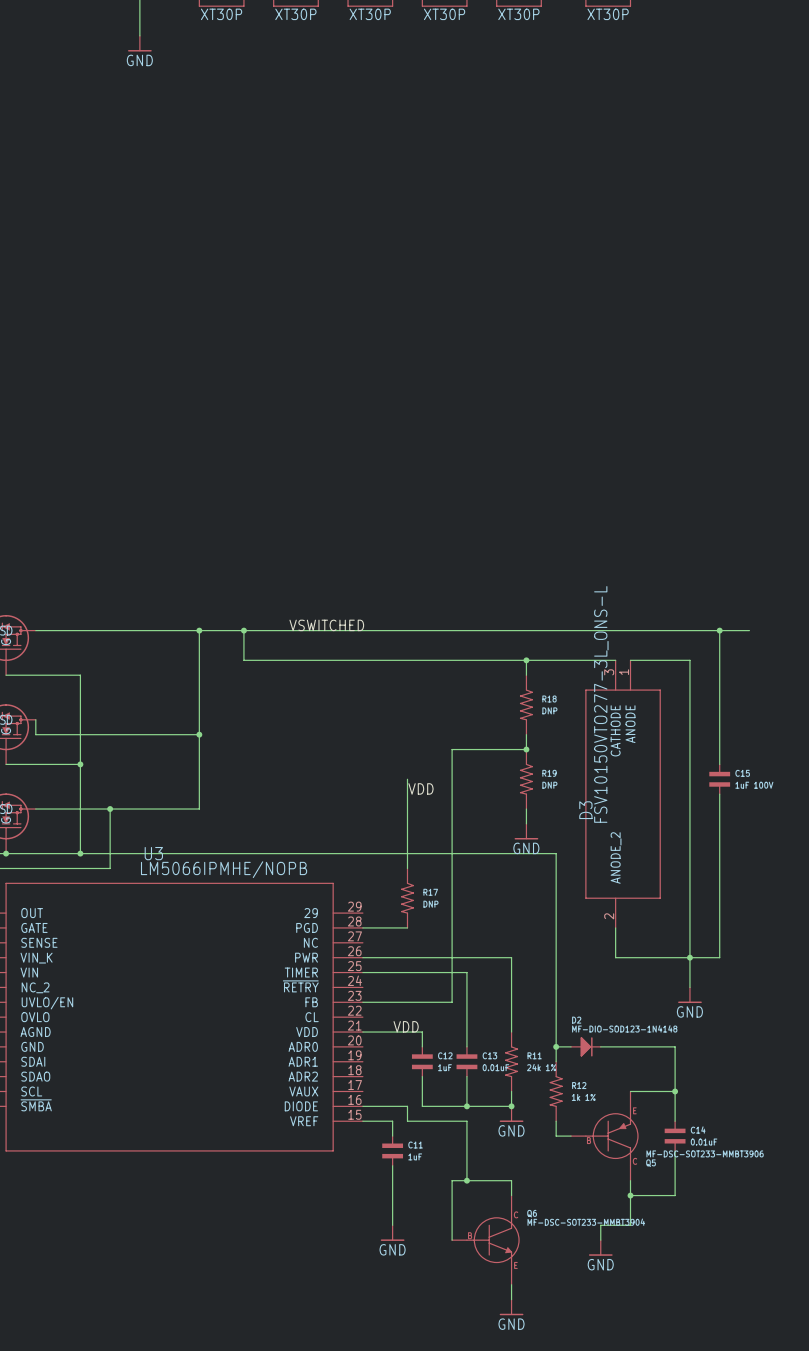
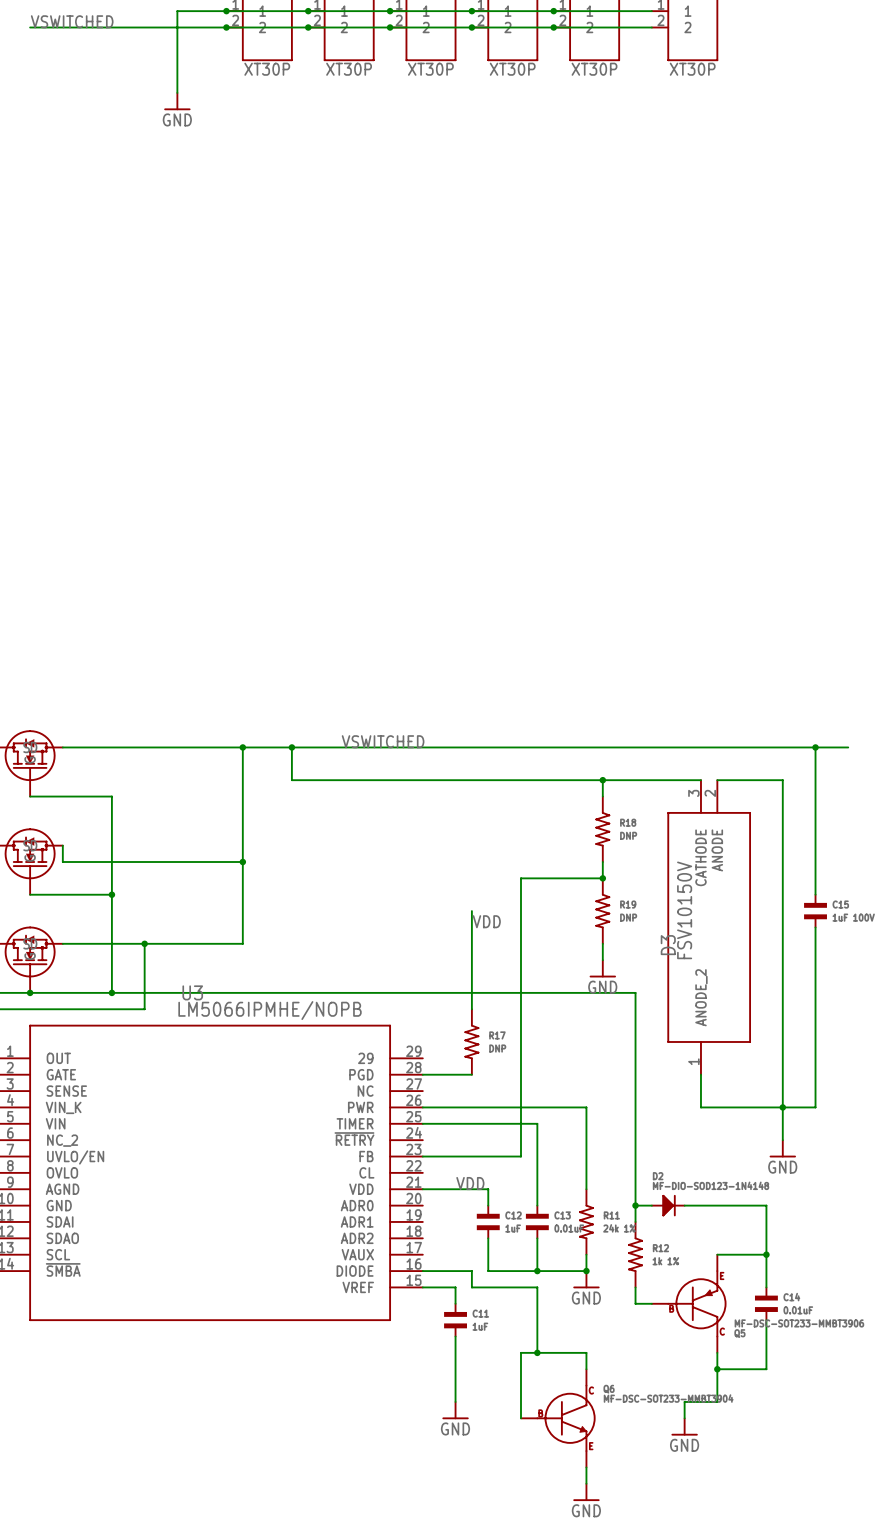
D3 pin number: 1 (624, 672) -> 2 (710, 793)
D3 value: FSV10150VTO277-3L_ONS-L (601, 704) -> FSV10150V (684, 910)
D3 pin number: 2 (609, 916) -> 1 (693, 1061)

